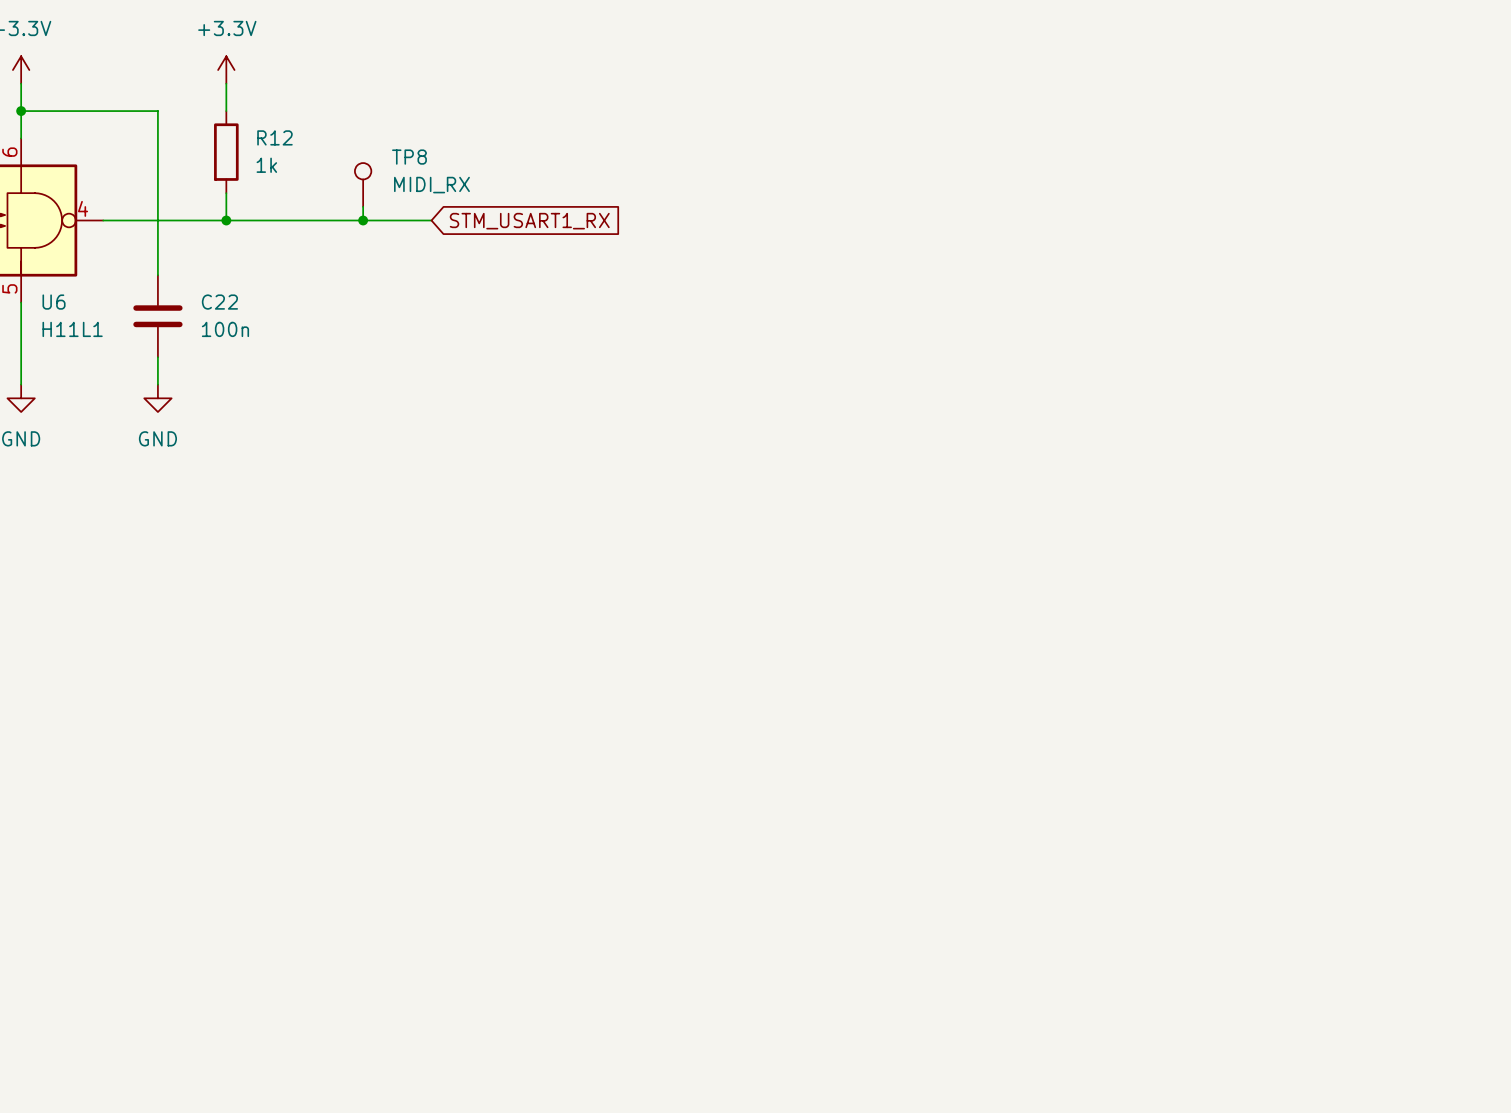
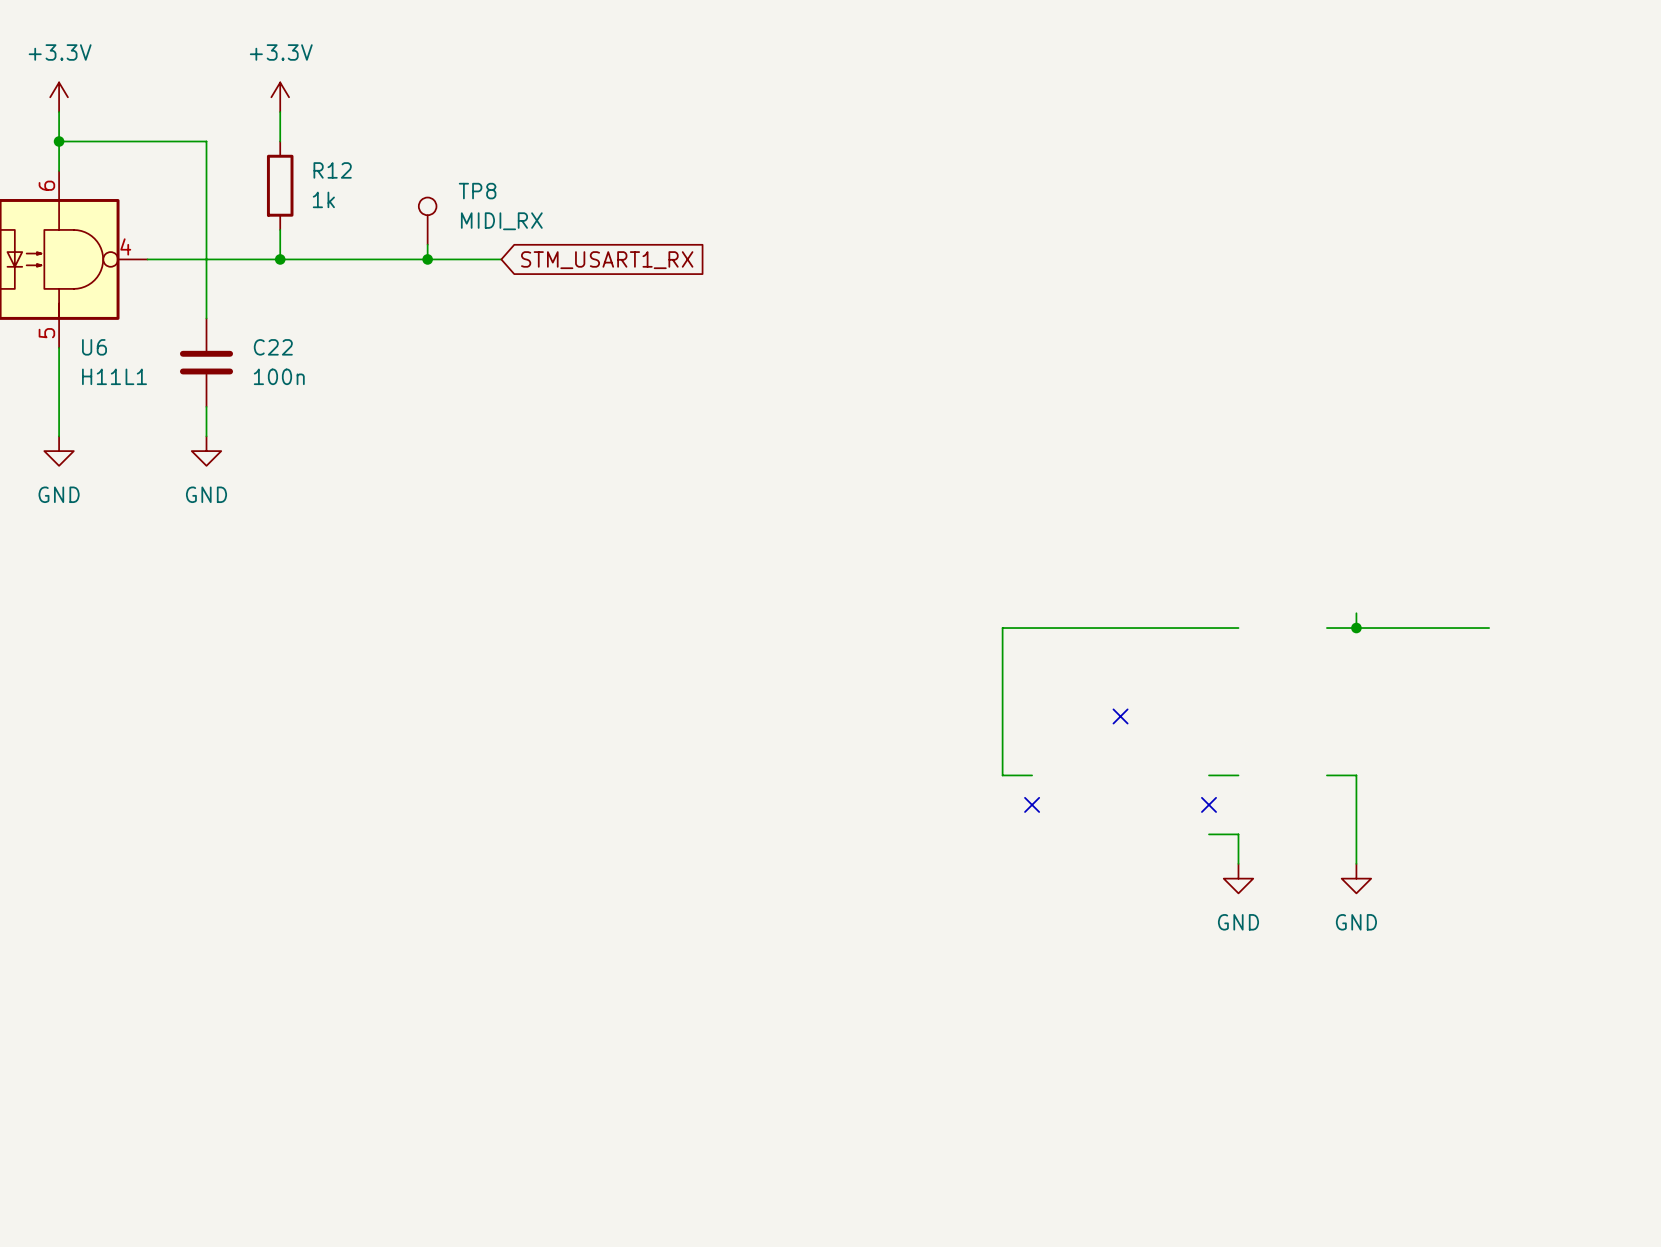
wire: none -> (1356, 613) (1356, 628)
wire: none -> (1238, 628) (1002, 628) (1002, 775) (1032, 775)
wire: none -> (1326, 628) (1489, 628)
junction: none -> (1356, 628)
no-connect mark: none -> (1120, 716)
wire: none -> (1209, 775) (1238, 775)
wire: none -> (1326, 775) (1356, 775) (1356, 863)
no-connect mark: none -> (1032, 804)
no-connect mark: none -> (1209, 804)
wire: none -> (1209, 834) (1238, 834) (1238, 863)
power symbol: none -> GND (1238, 878)
power symbol: none -> GND (1356, 878)

